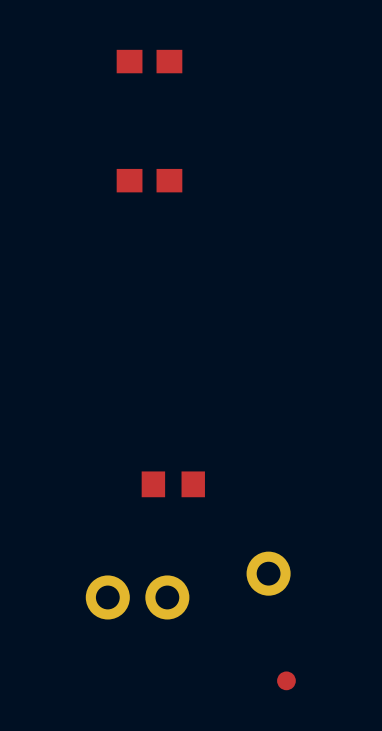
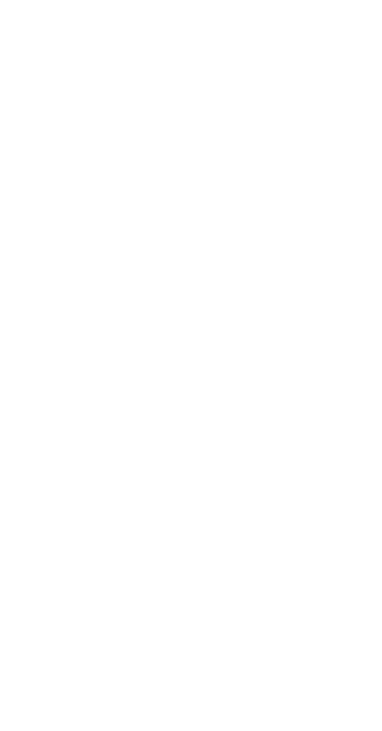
part: (149, 61) -> none
part: (149, 180) -> none
part: (173, 484) -> none
part: (268, 573) -> none
part: (137, 597) -> none
part: (286, 680) -> none

